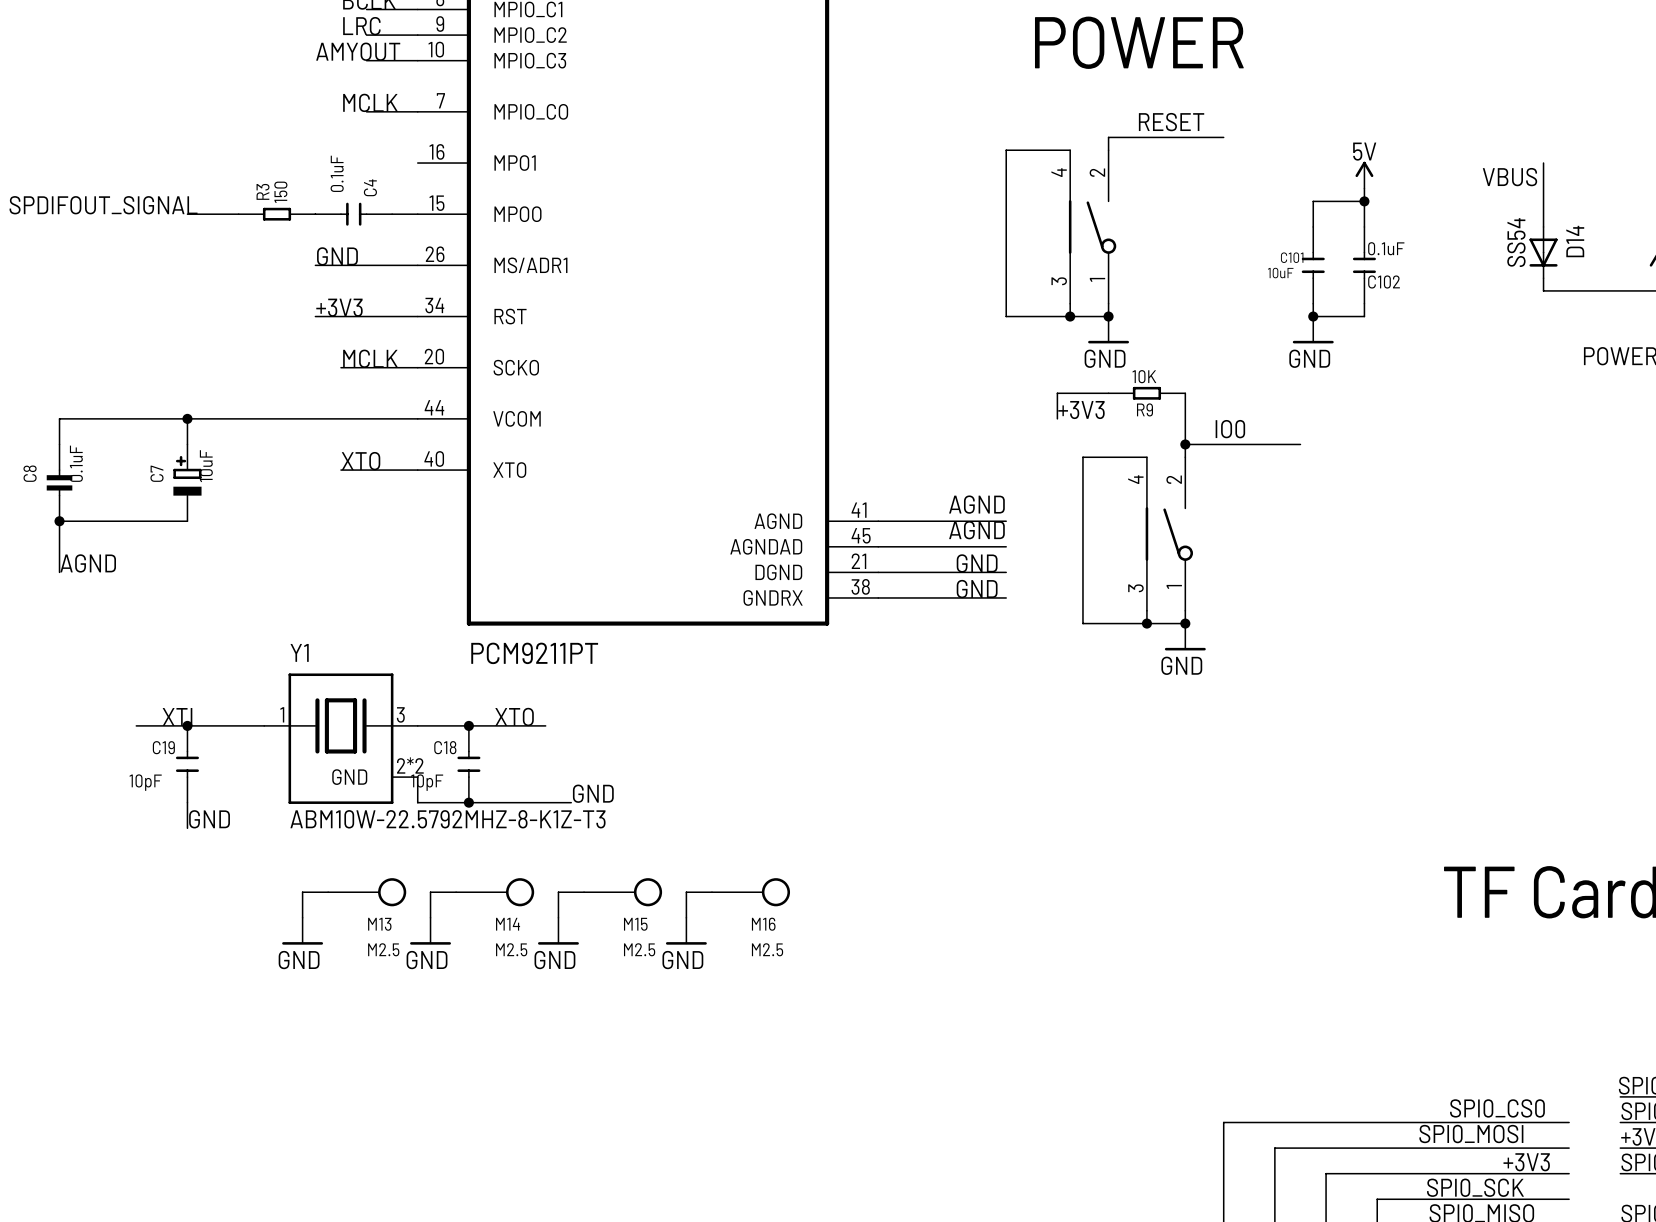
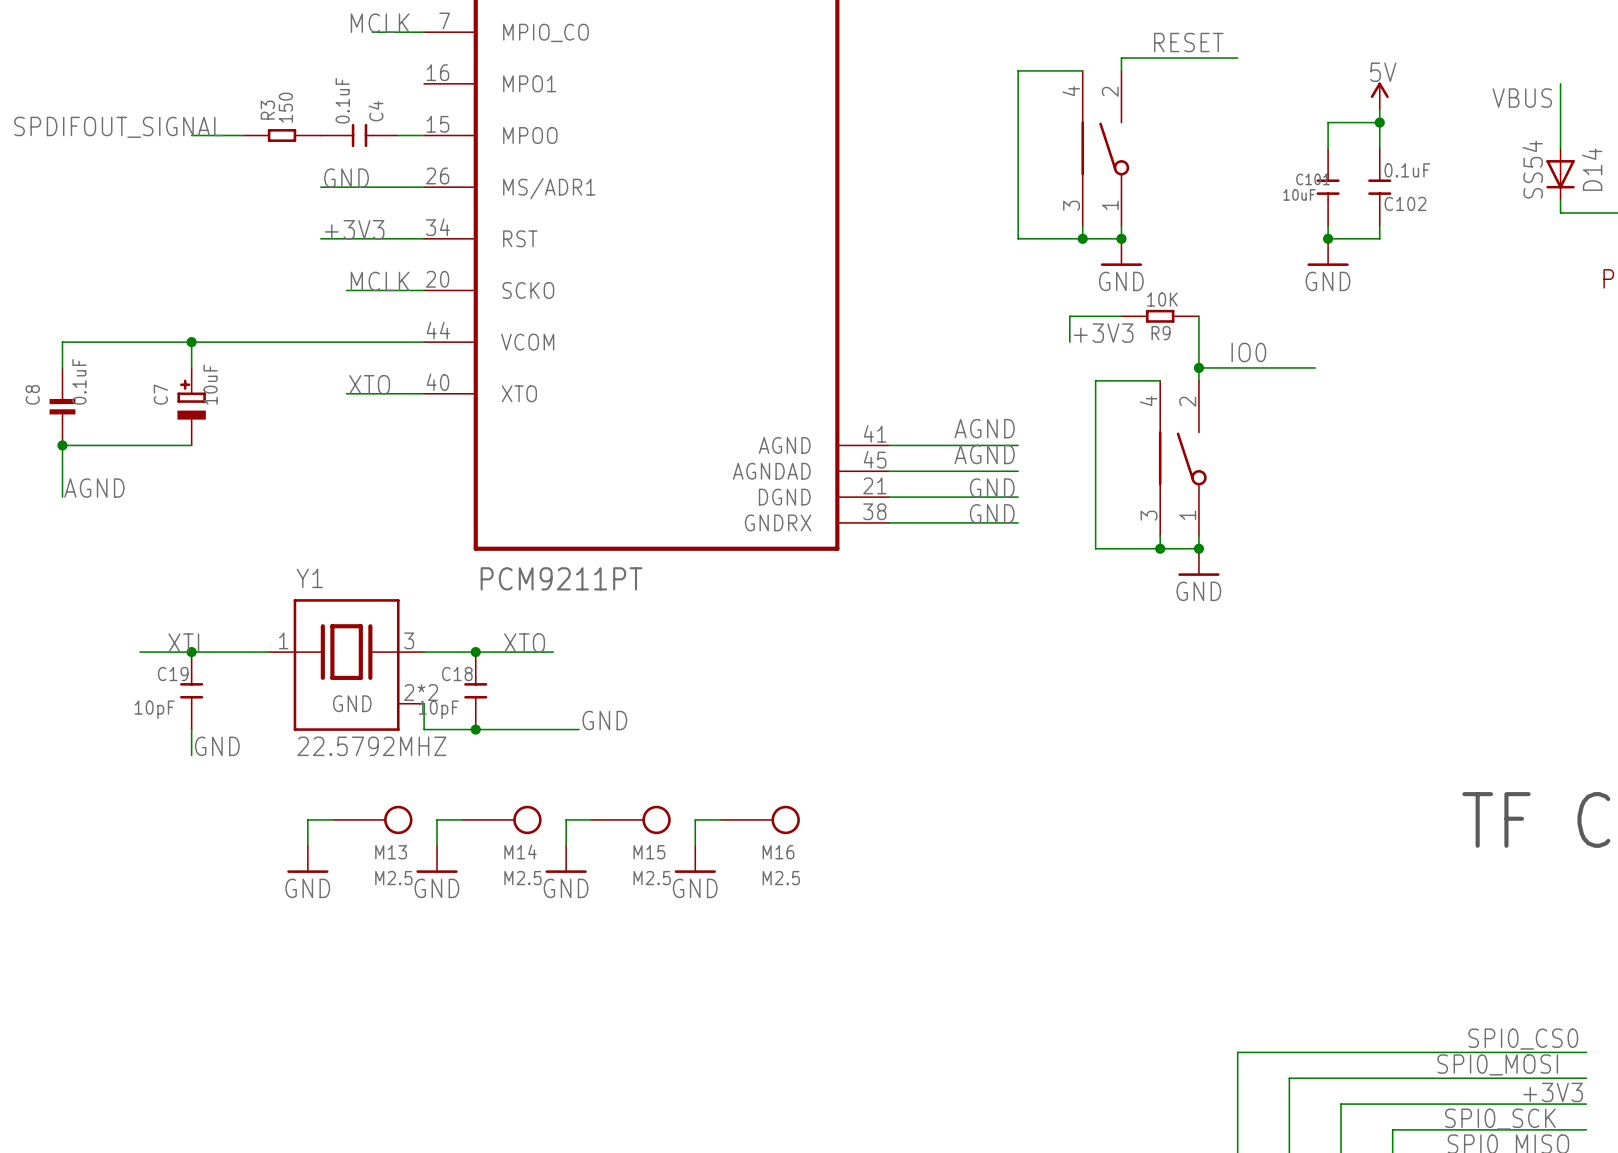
Y1 value: ABM10W-22.5792MHZ-8-K1Z-T3 (447, 819) -> 22.5792MHZ (371, 746)

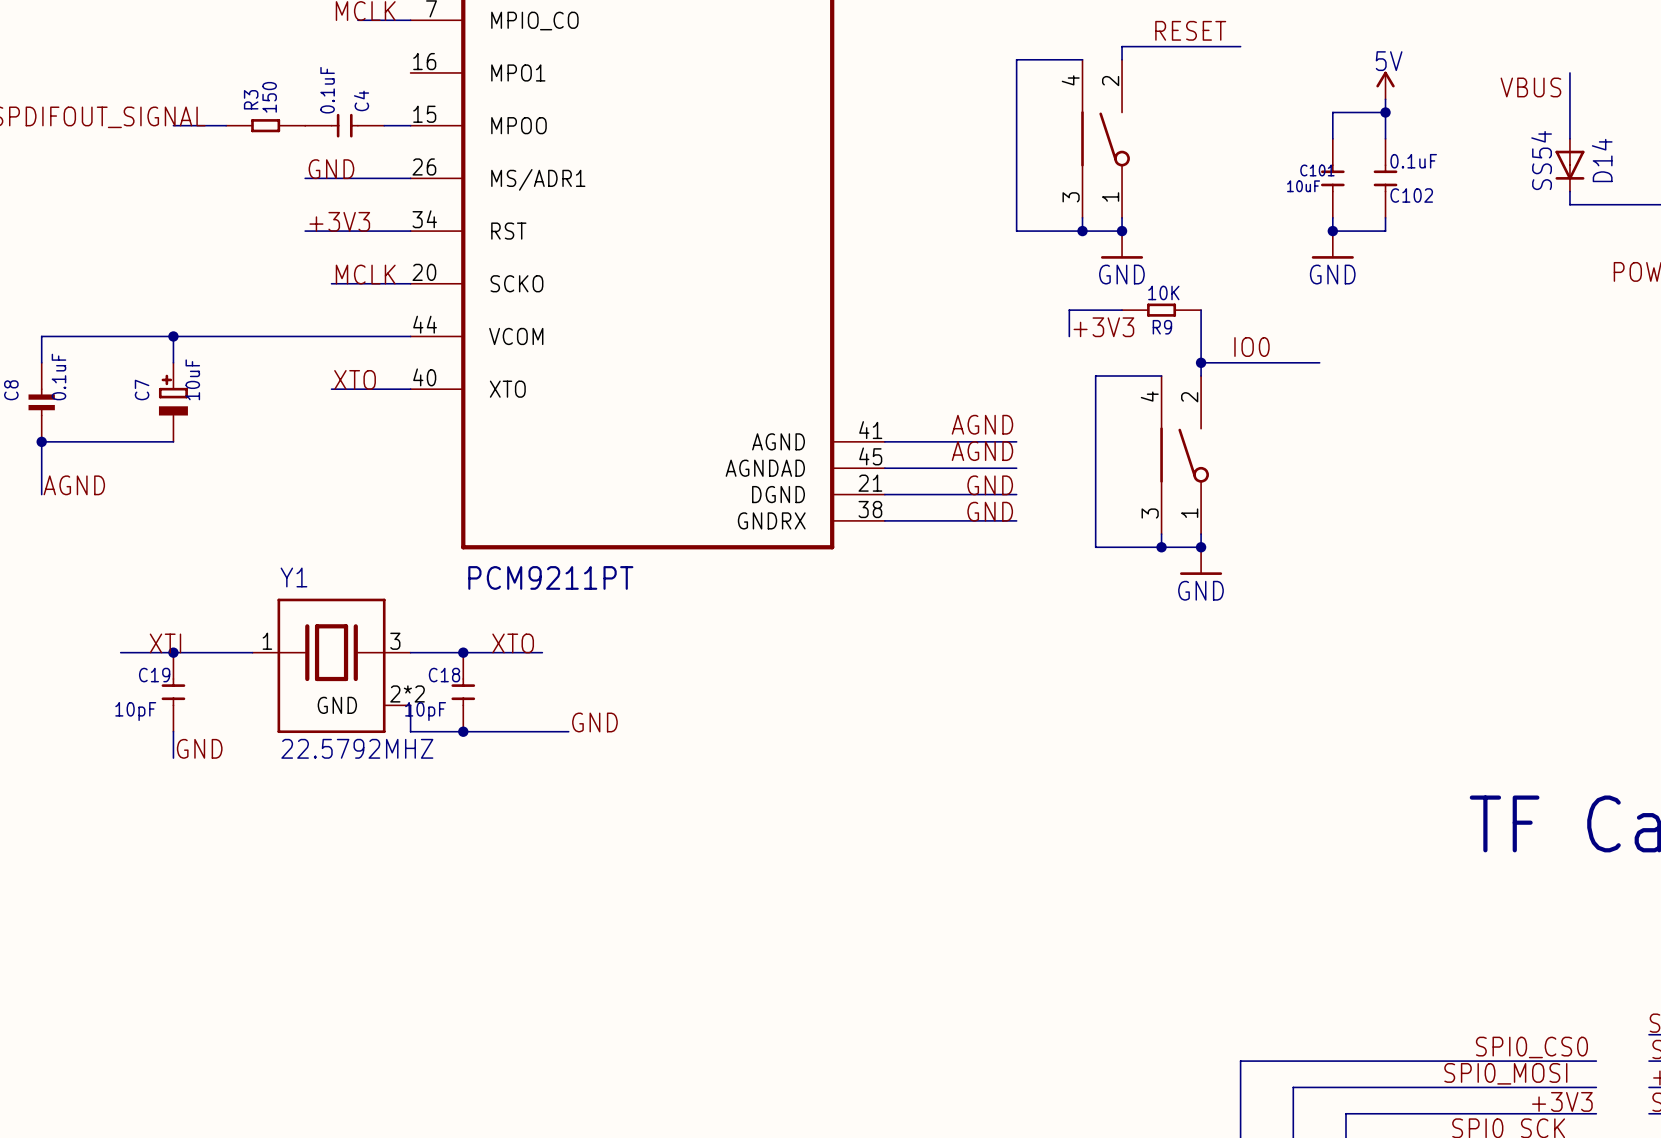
wire: (333, 819) (307, 819) (307, 845) -> none
M13: M2.5 (373, 819) -> none
wire: (462, 819) (437, 819) (437, 845) -> none
M14: M2.5 (502, 819) -> none
wire: (591, 819) (566, 819) (566, 845) -> none
M15: M2.5 (631, 819) -> none
wire: (721, 819) (695, 819) (695, 845) -> none
M16: M2.5 (760, 819) -> none
power symbol: GND (307, 859) -> none
power symbol: GND (437, 859) -> none
power symbol: GND (566, 859) -> none
power symbol: GND (695, 859) -> none

